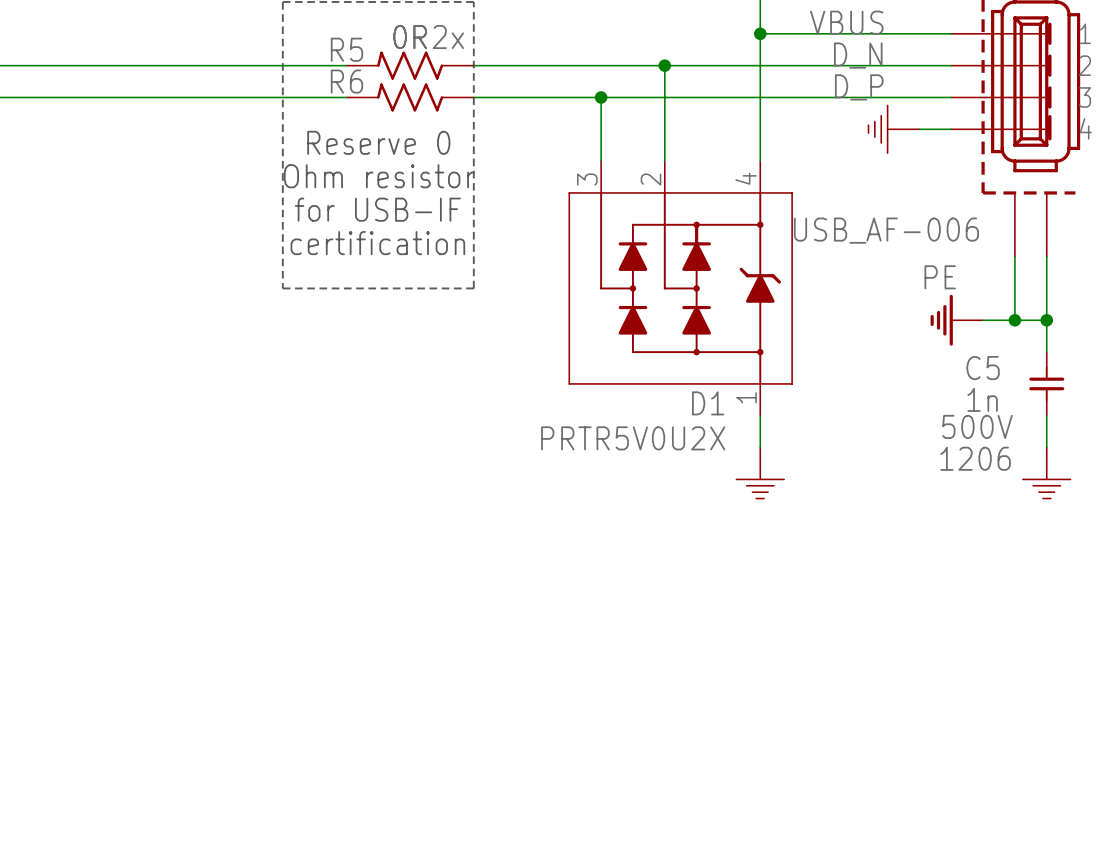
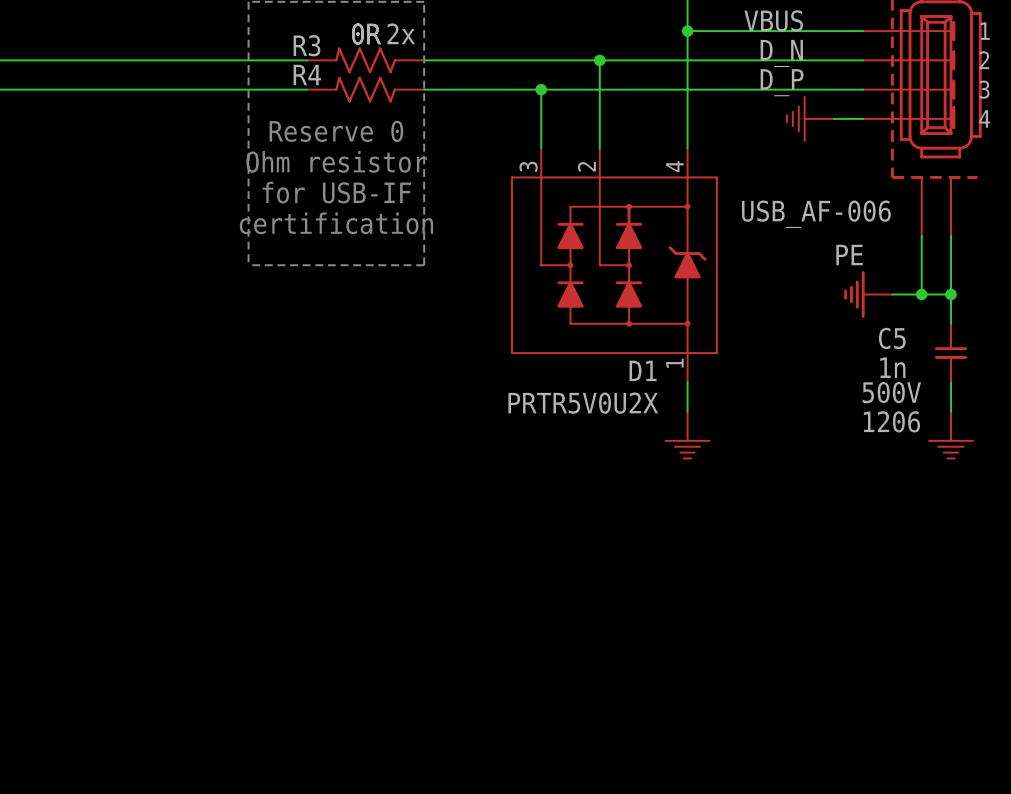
R5 name: R5 (346, 49) -> R3 (307, 45)
R6 name: R6 (346, 81) -> R4 (307, 75)

